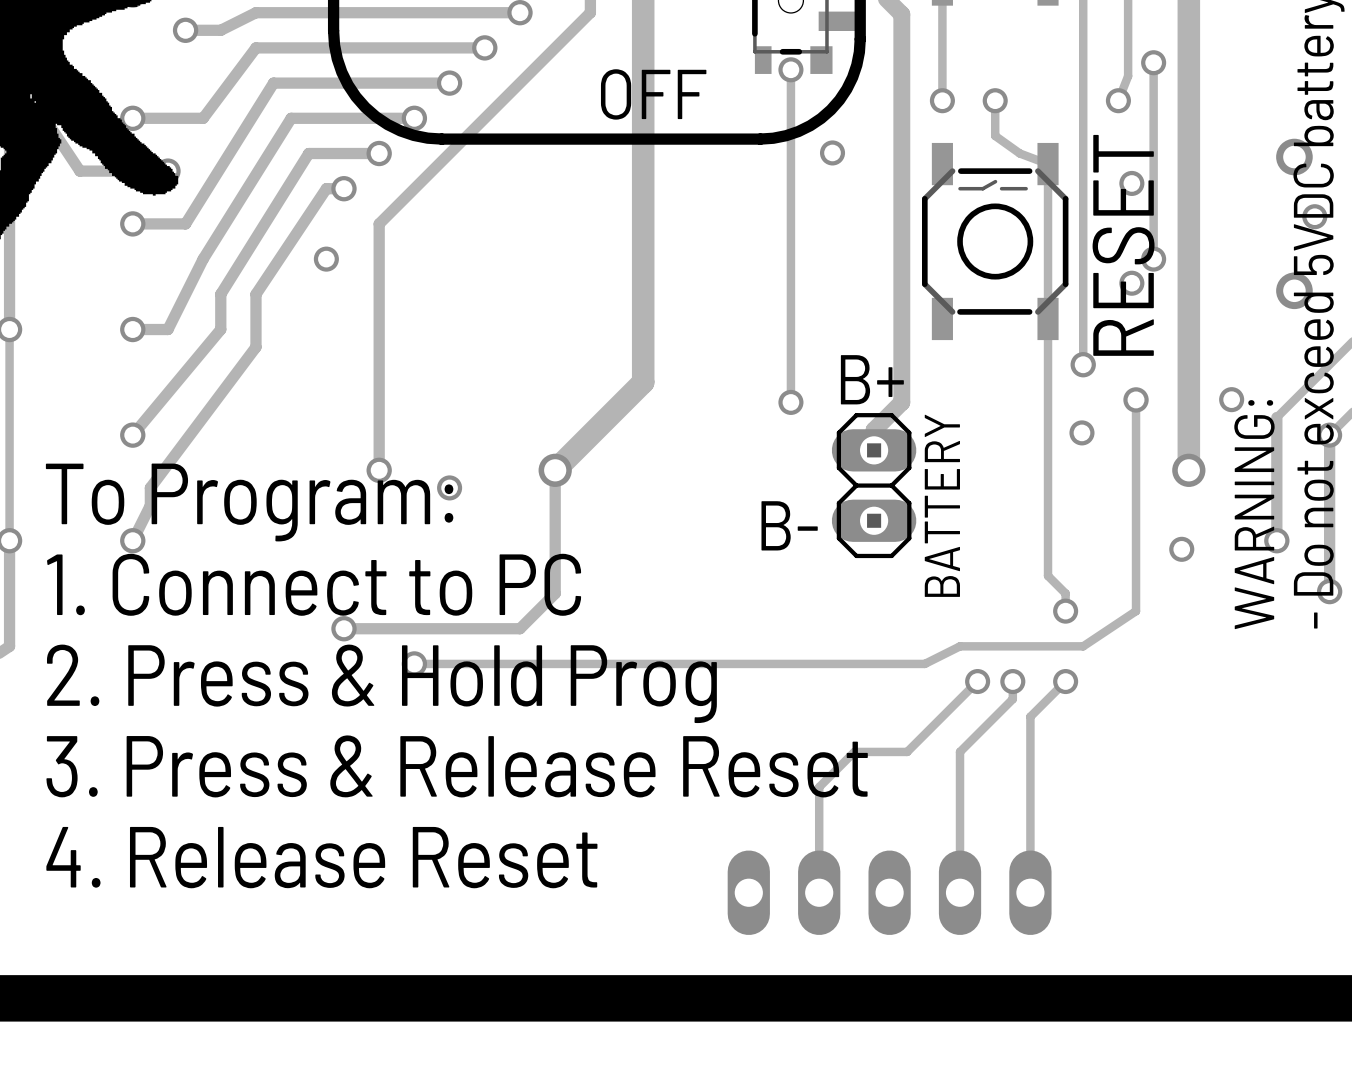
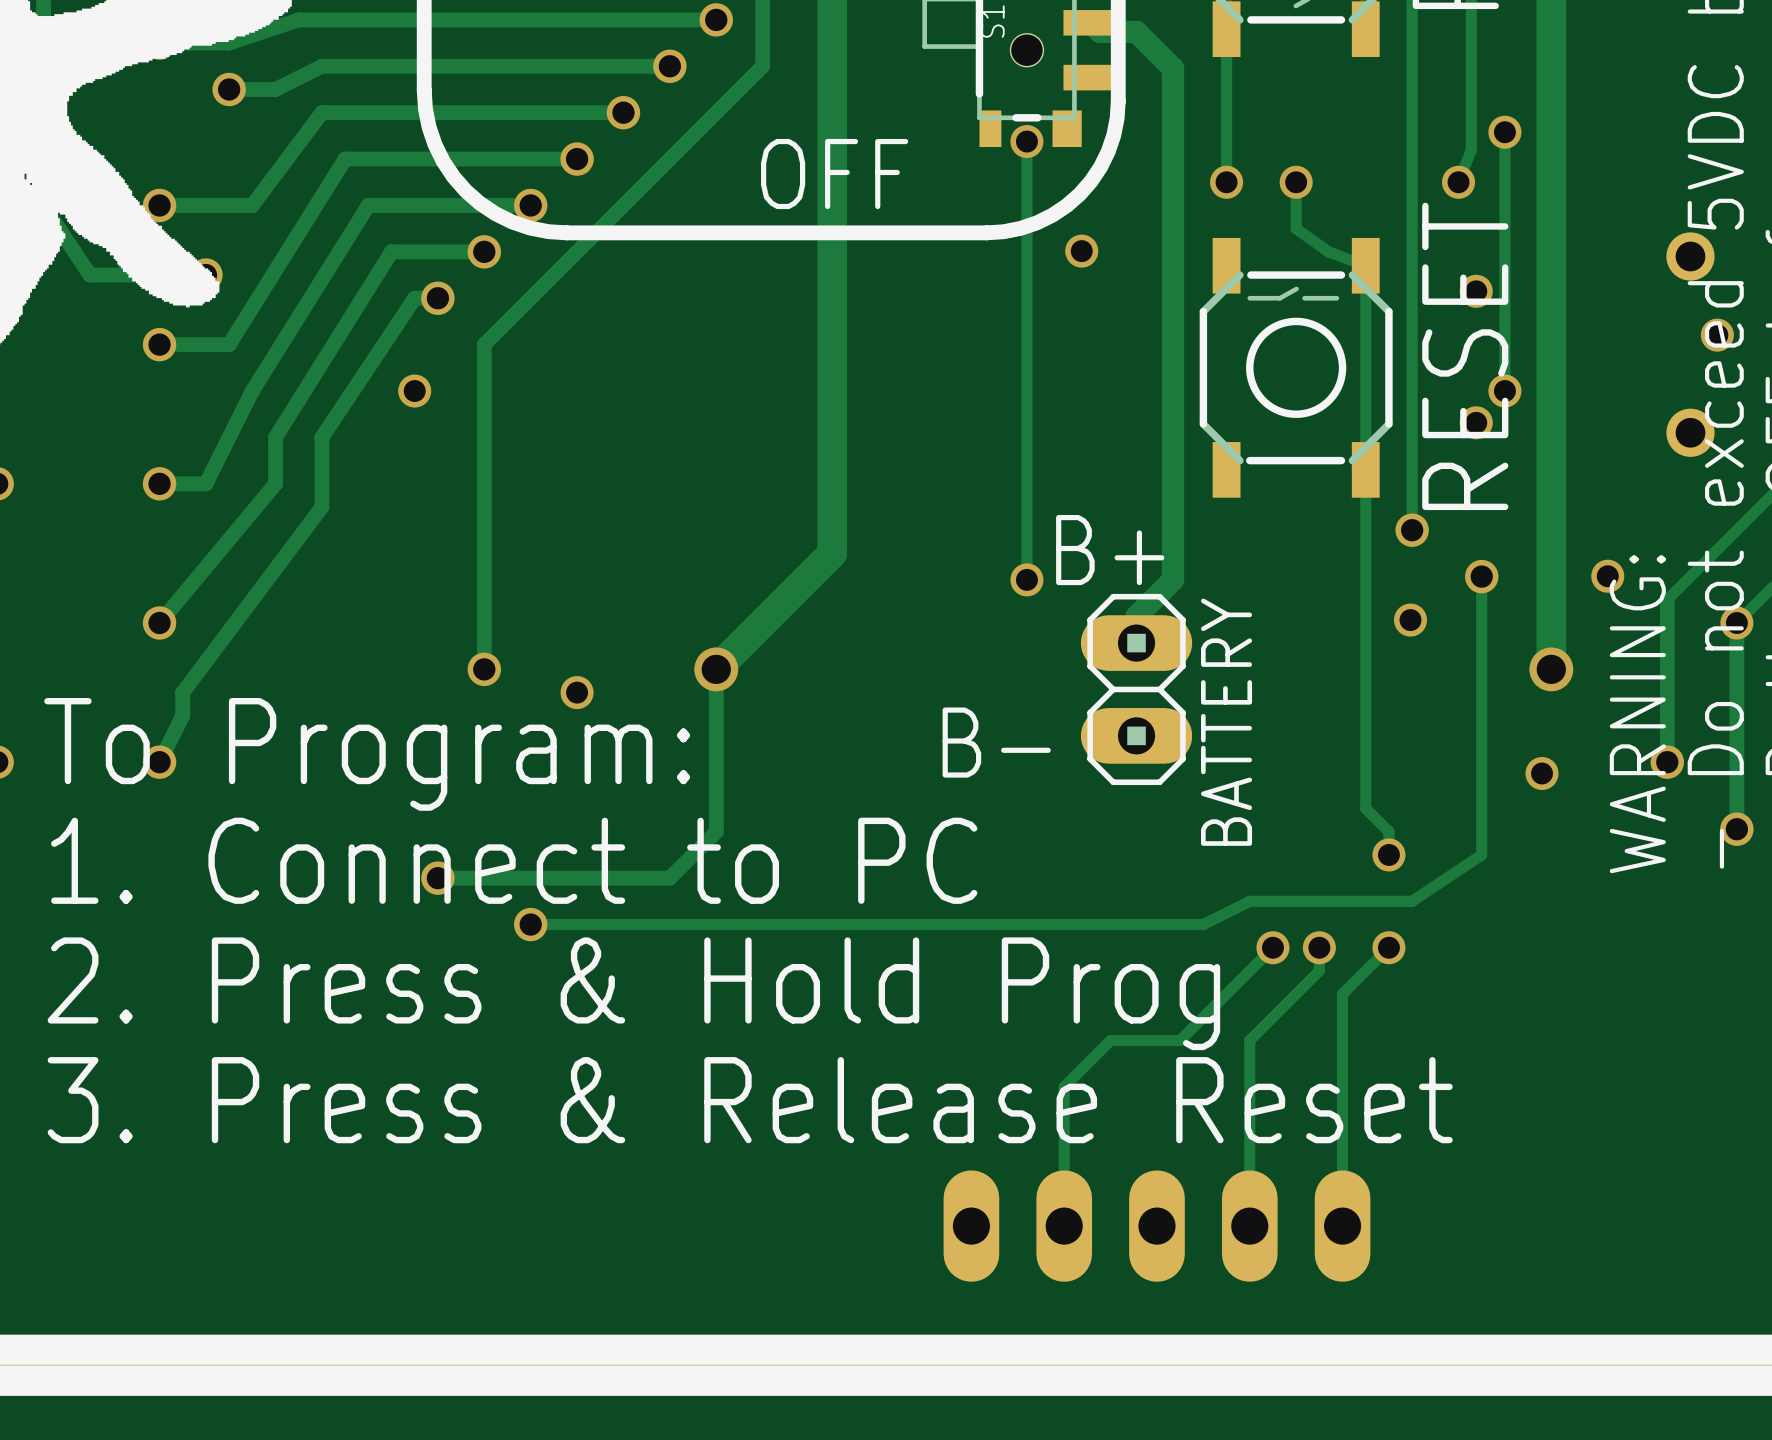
text position: To Program: (249, 502) -> To Program: (367, 754)
text position: 1. Connect to PC (314, 584) -> 1. Connect to PC (514, 860)
text position: 2. Press & Hold Prog (381, 683) -> 2. Press & Hold Prog (633, 993)
text position: 3. Press & Release Reset (457, 766) -> 3. Press & Release Reset (750, 1100)
text: 4. Release Reset (321, 857) -> none

